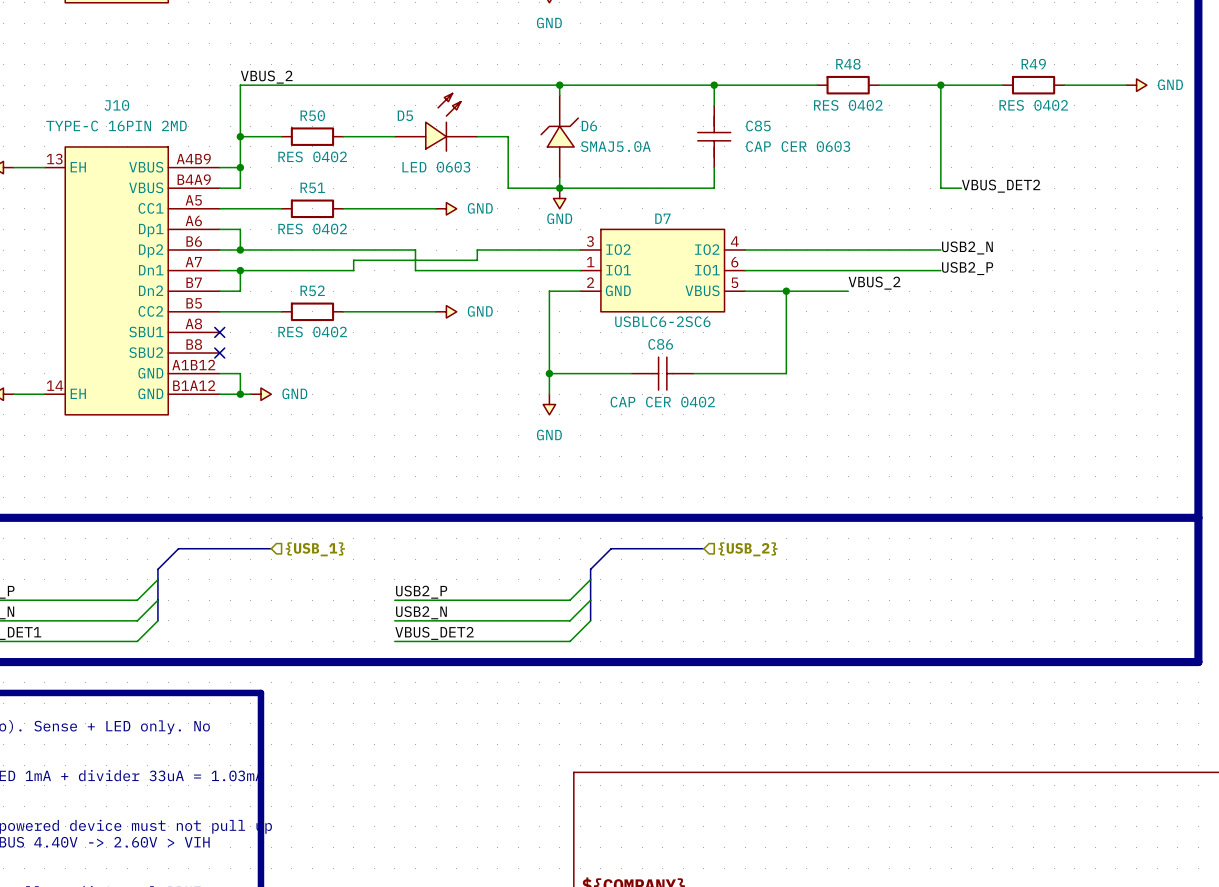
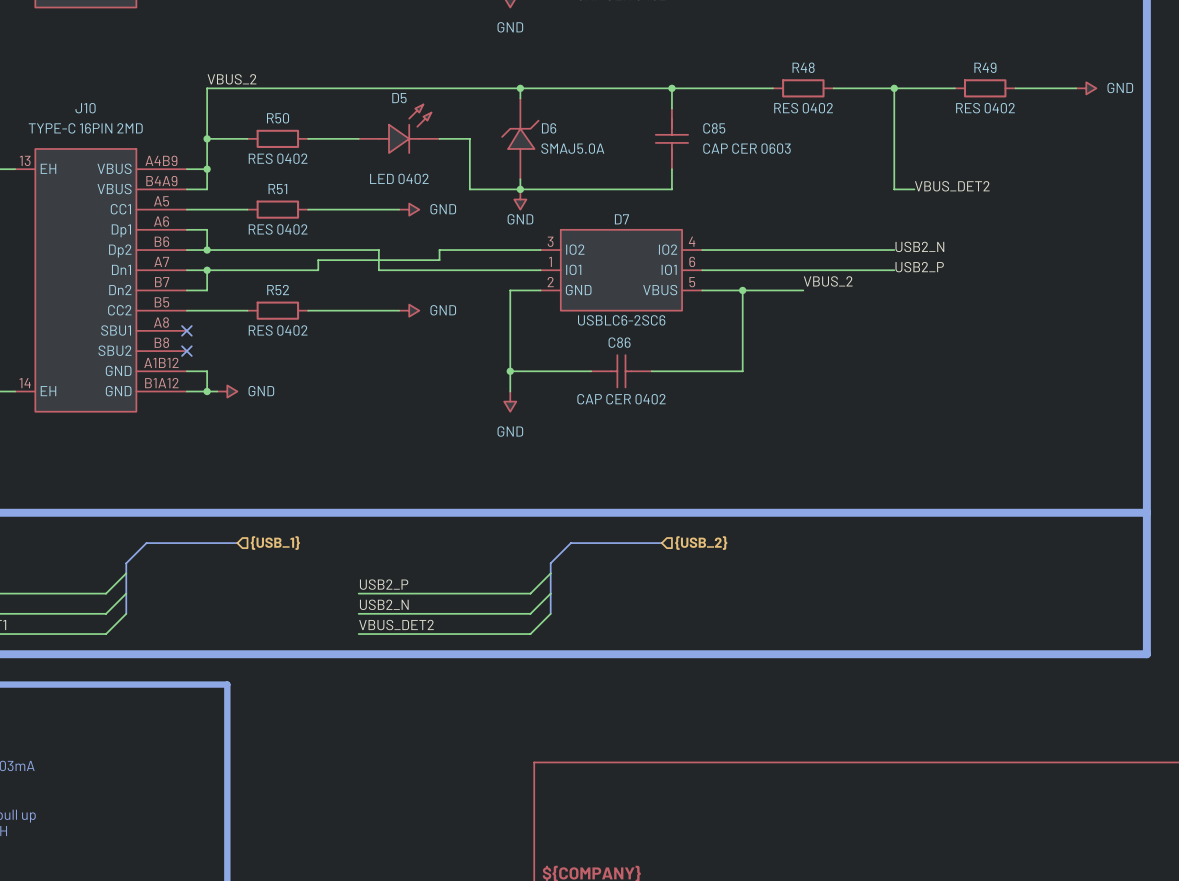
D5 symbol: [394, 93, 478, 152] -> [358, 104, 440, 154]
D5 name position: D5 (405, 115) -> D5 (399, 98)
D5 value: LED 0603 (436, 167) -> LED 0402 (399, 178)

